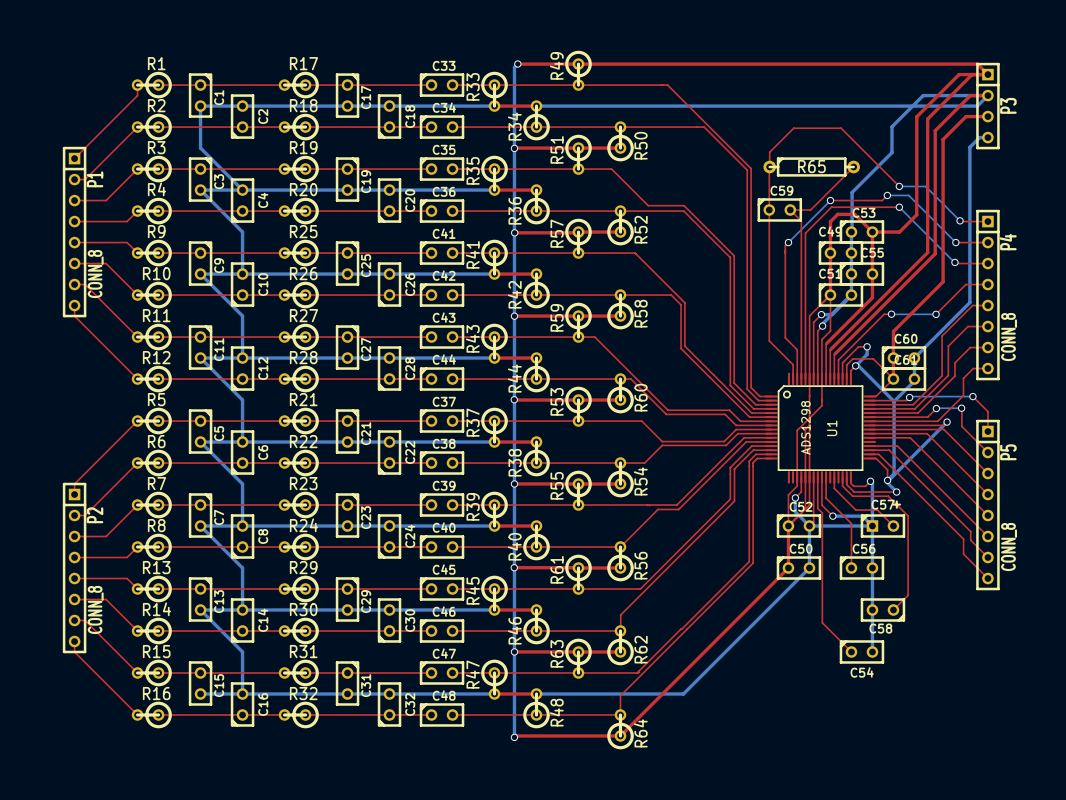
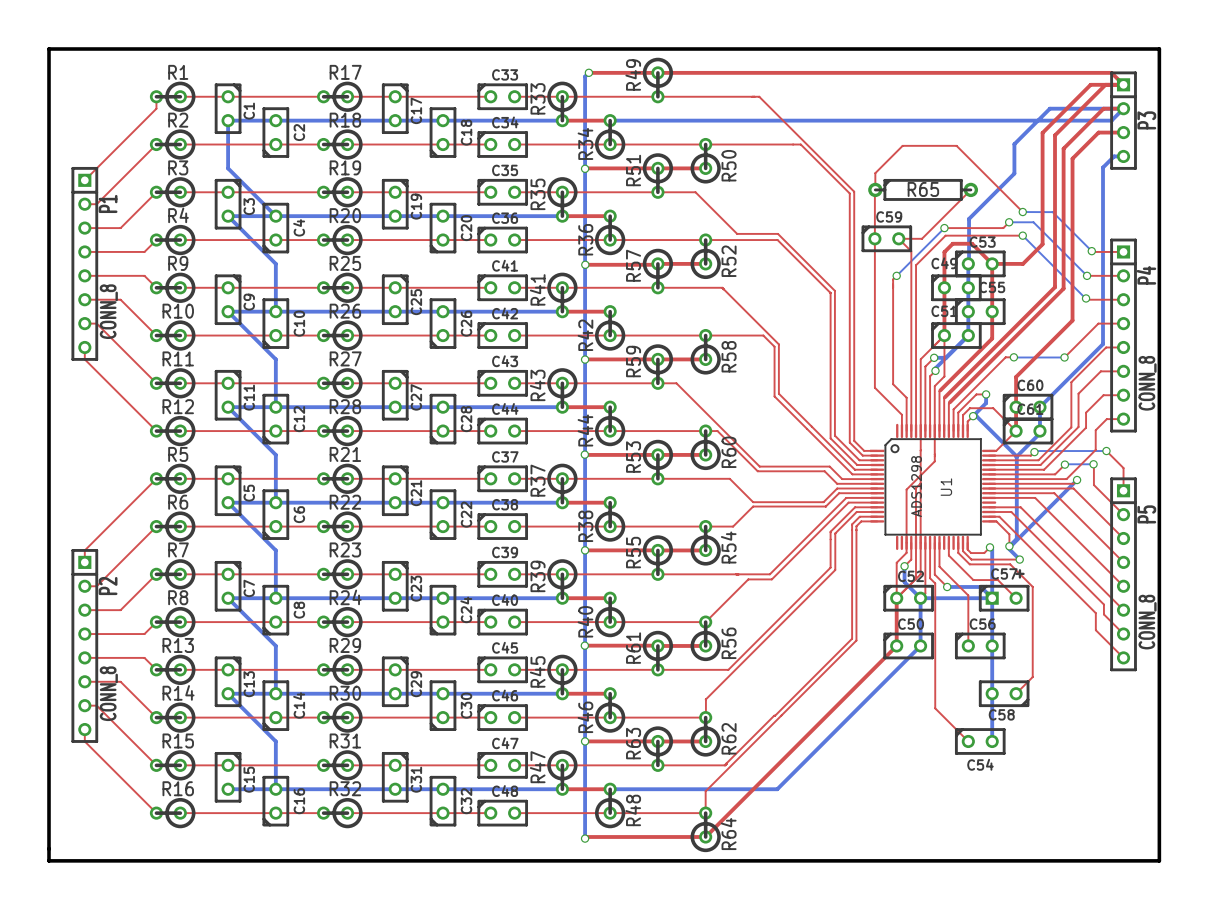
board edge: none -> (49, 49) (49, 860) (1159, 860) (1159, 49) (49, 49)

